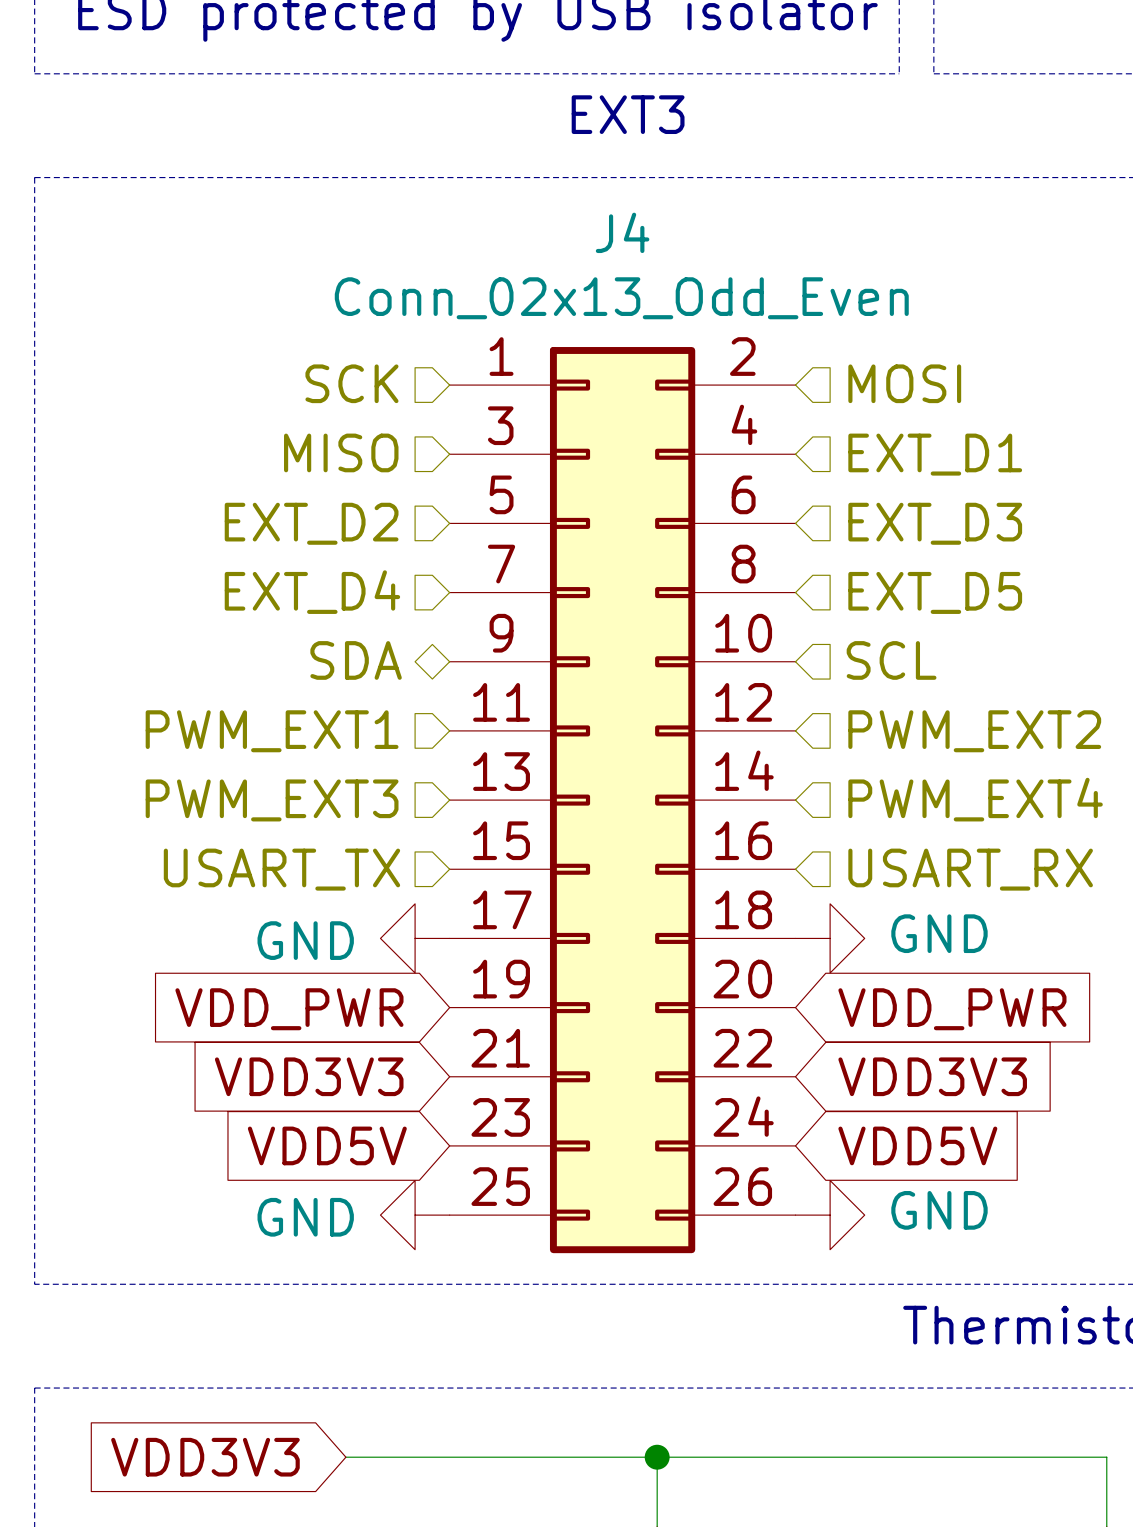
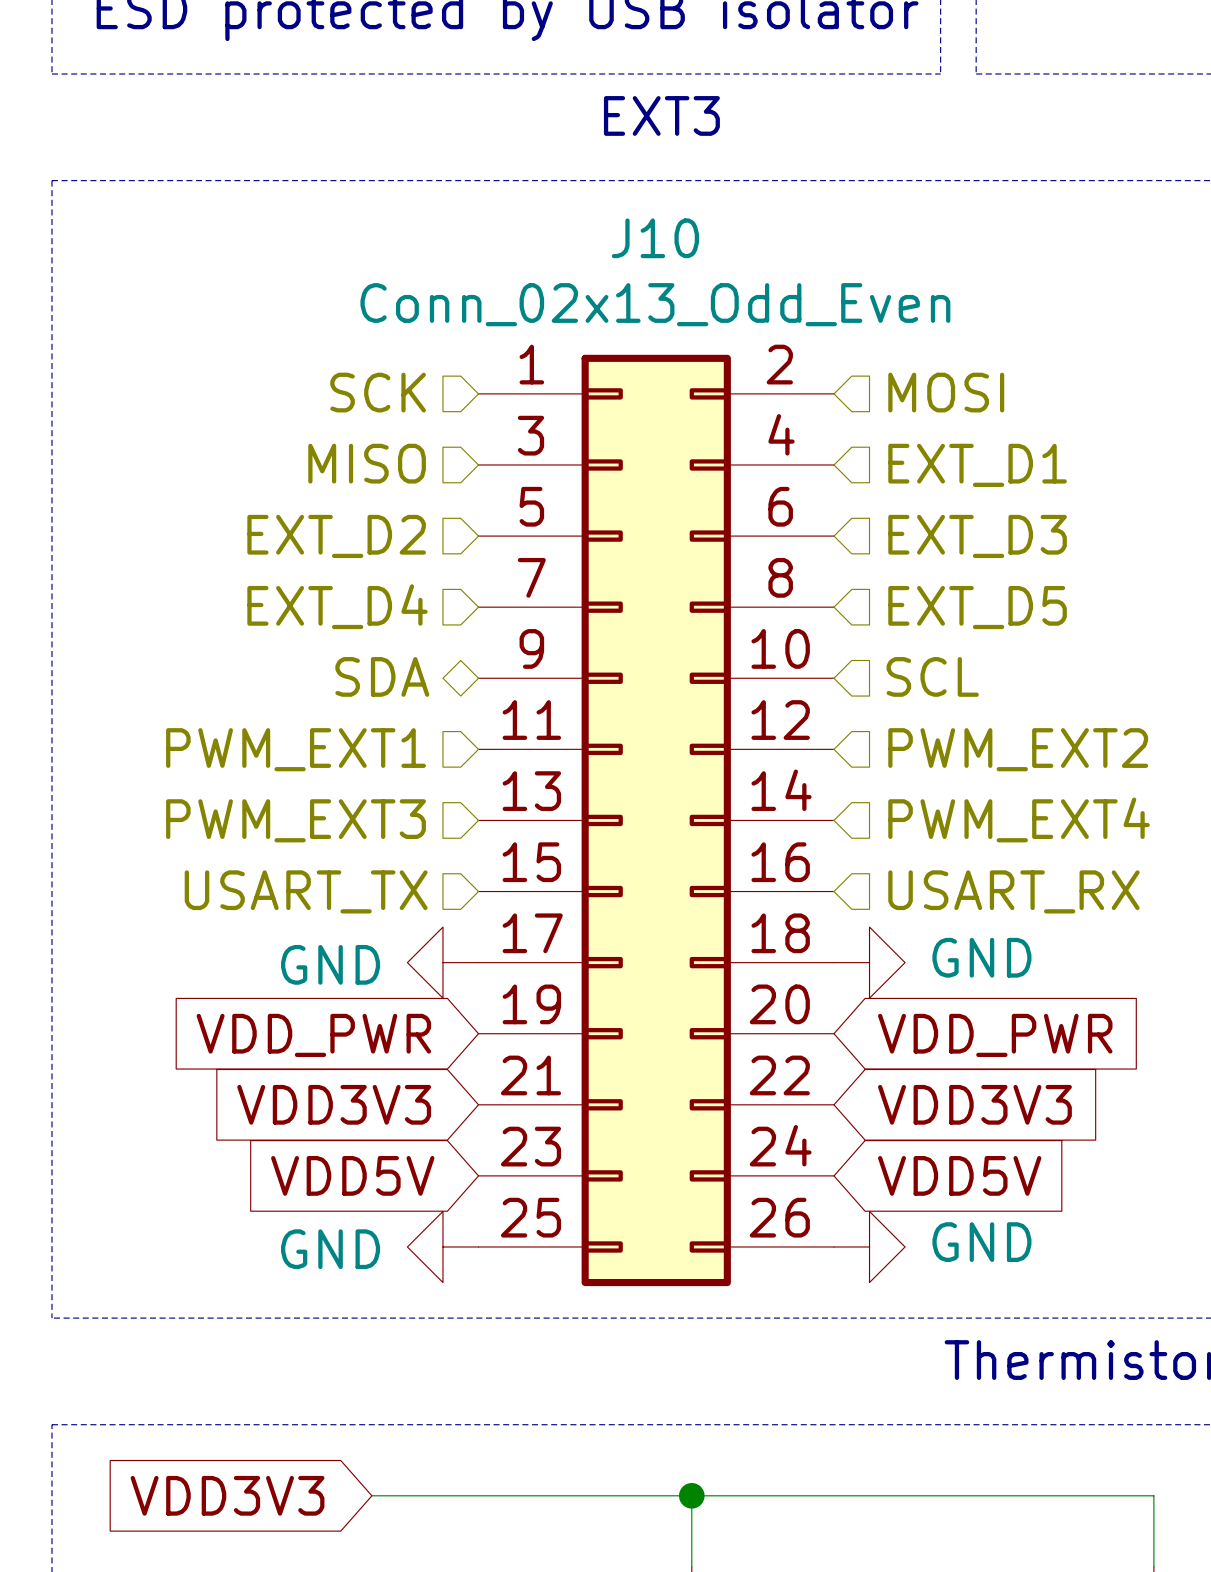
J4 name: J4 (622, 232) -> J10 (655, 238)

